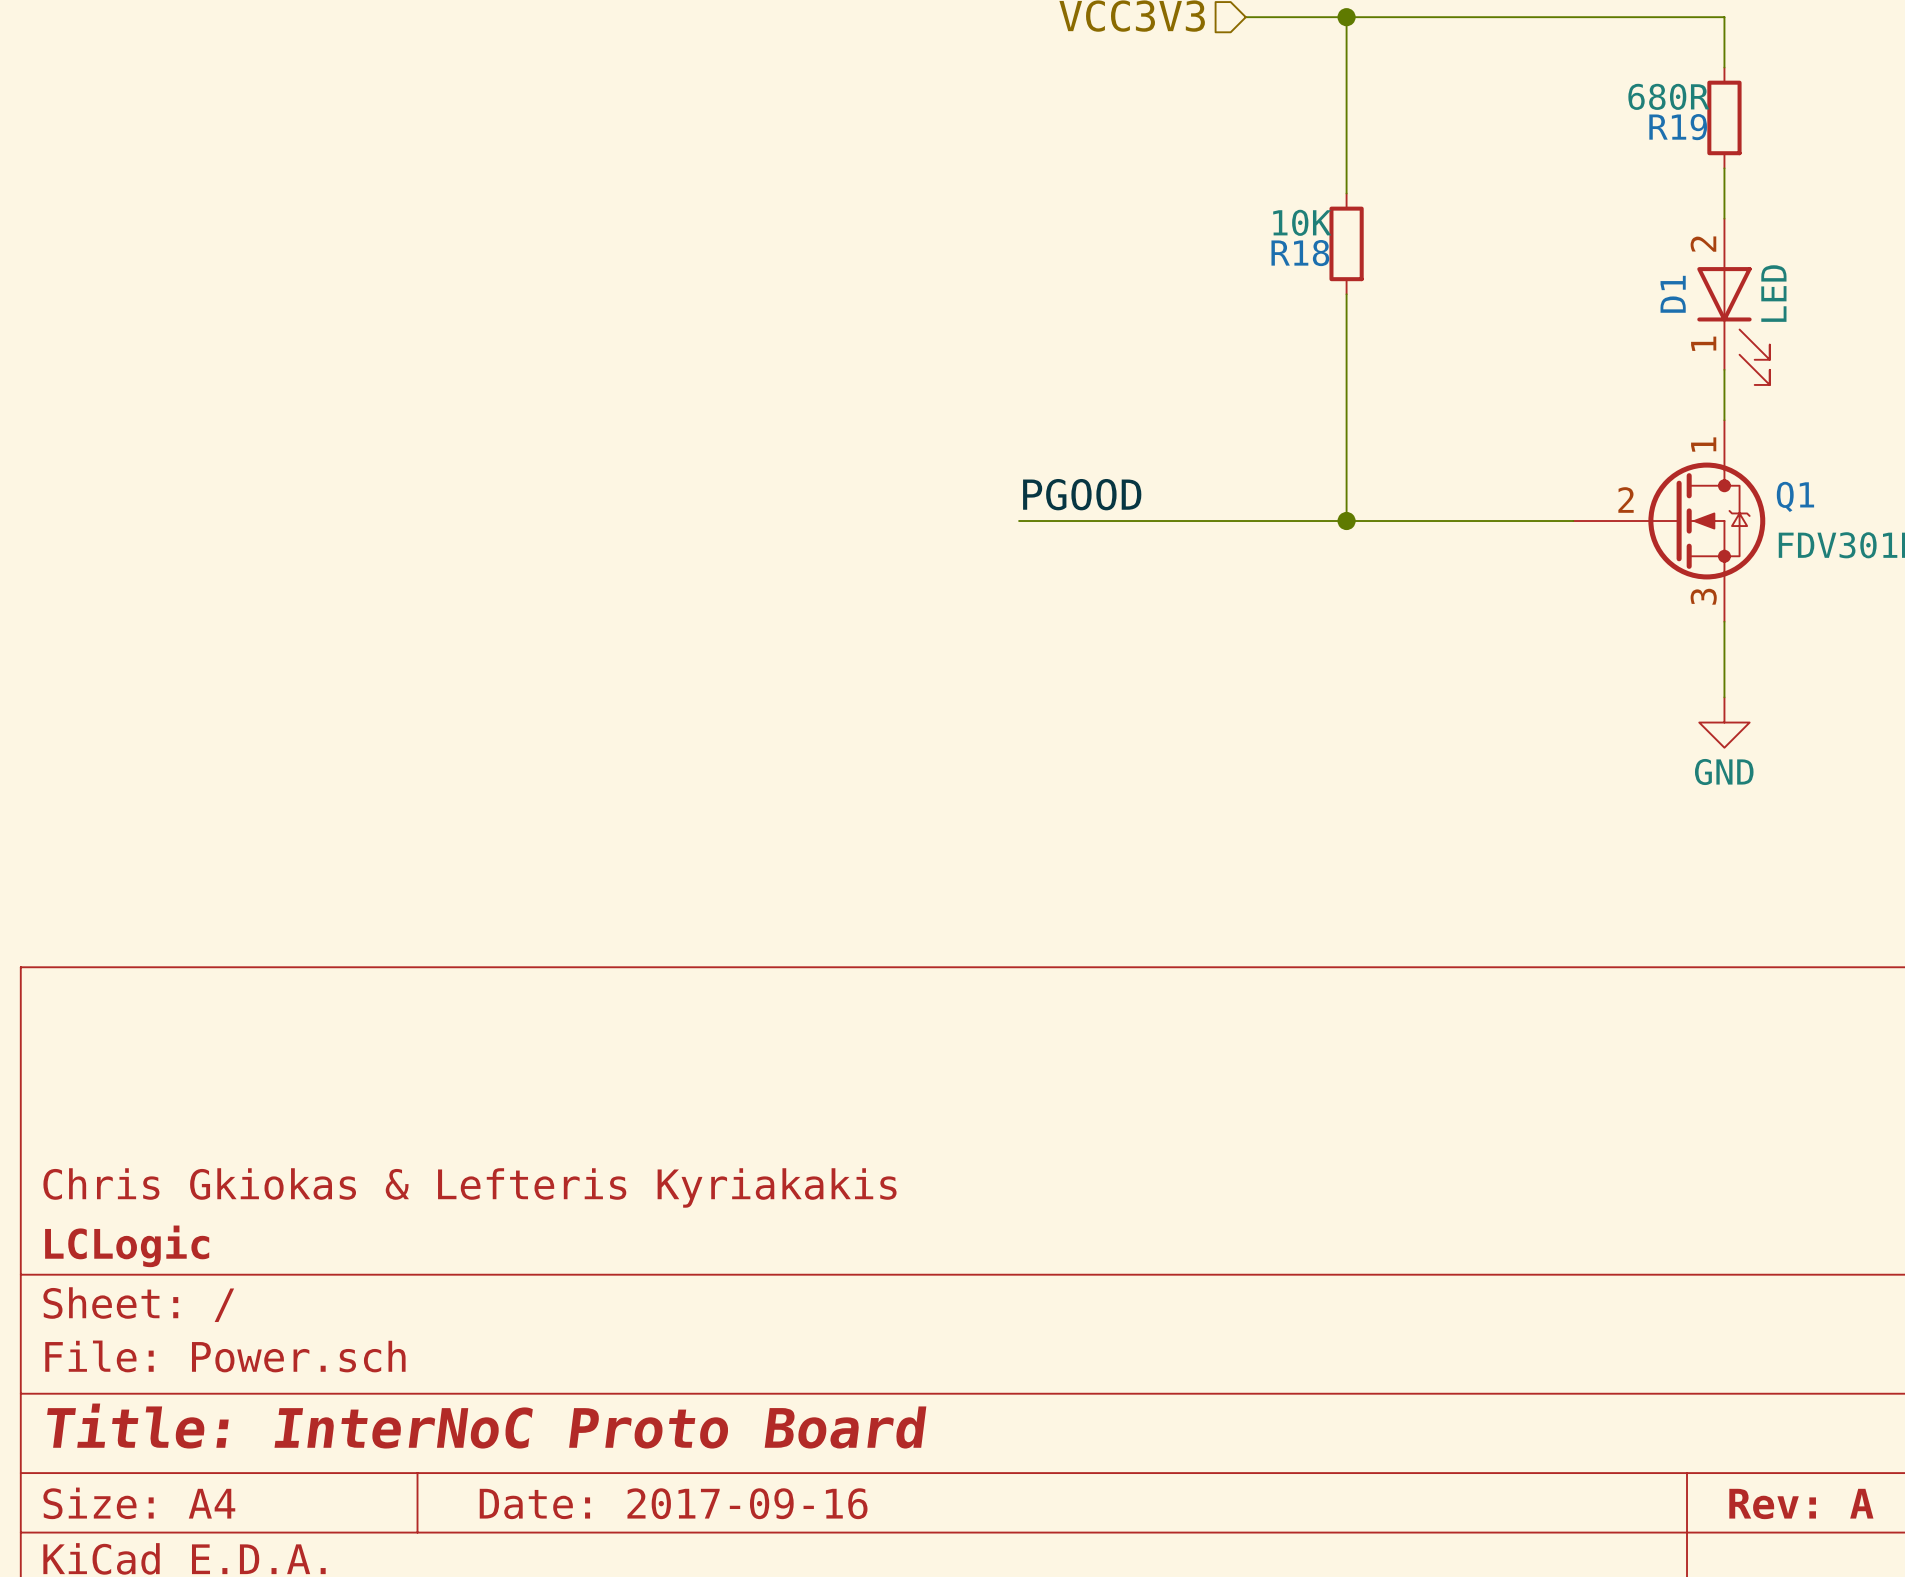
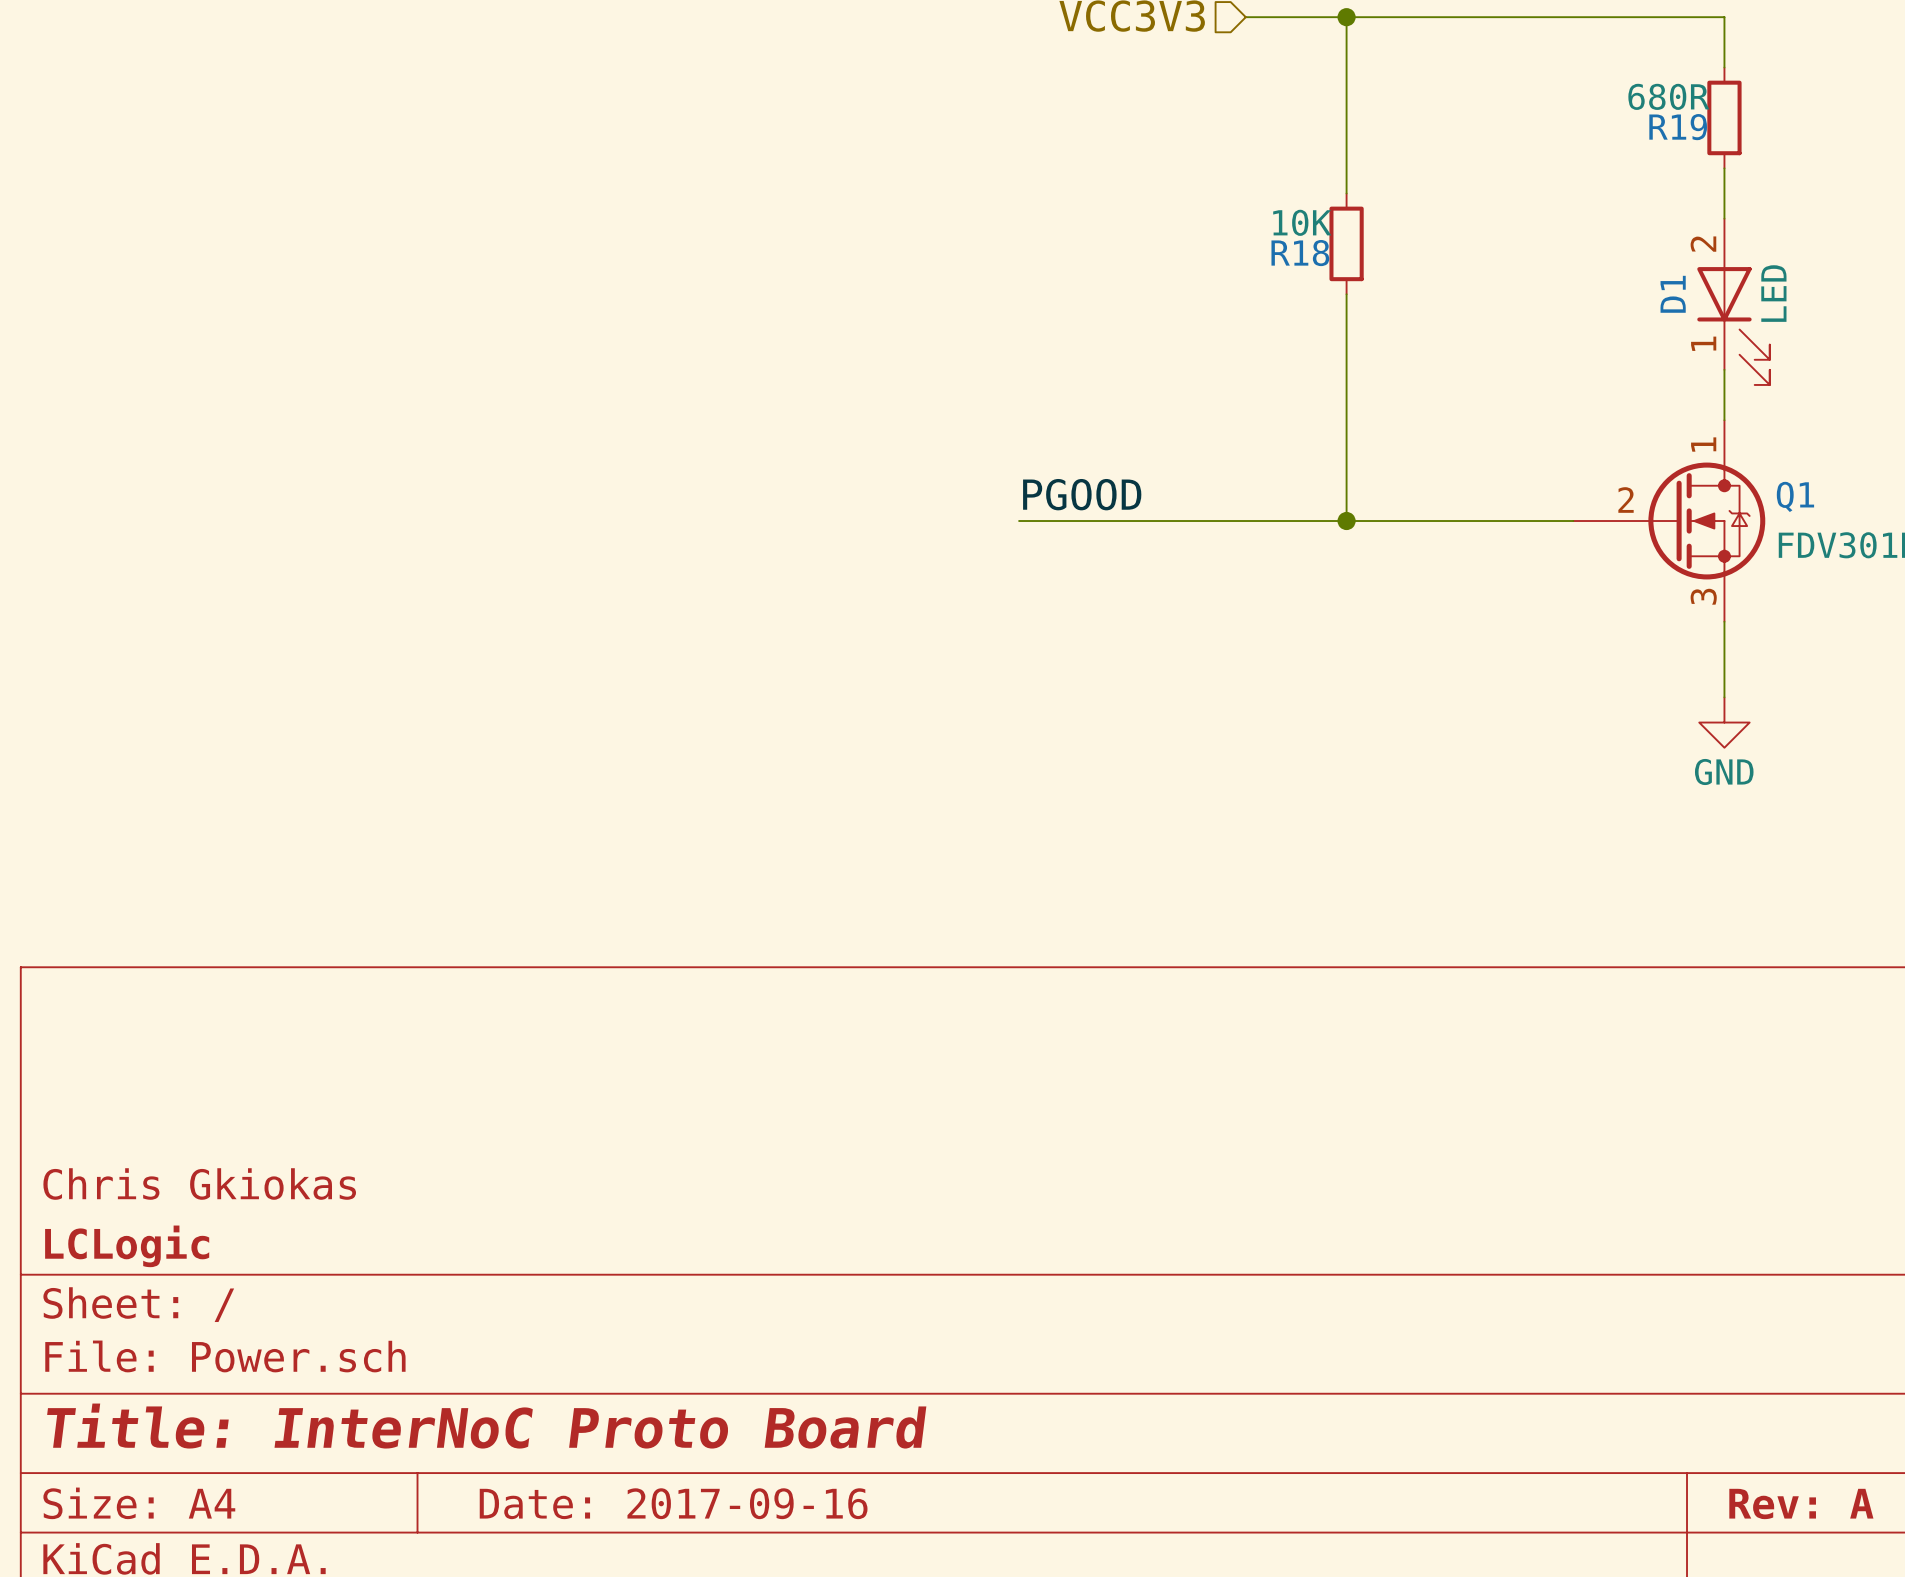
title block: Chris Gkiokas & Lefteris Kyriakakis (469, 1187) -> Chris Gkiokas (199, 1184)

